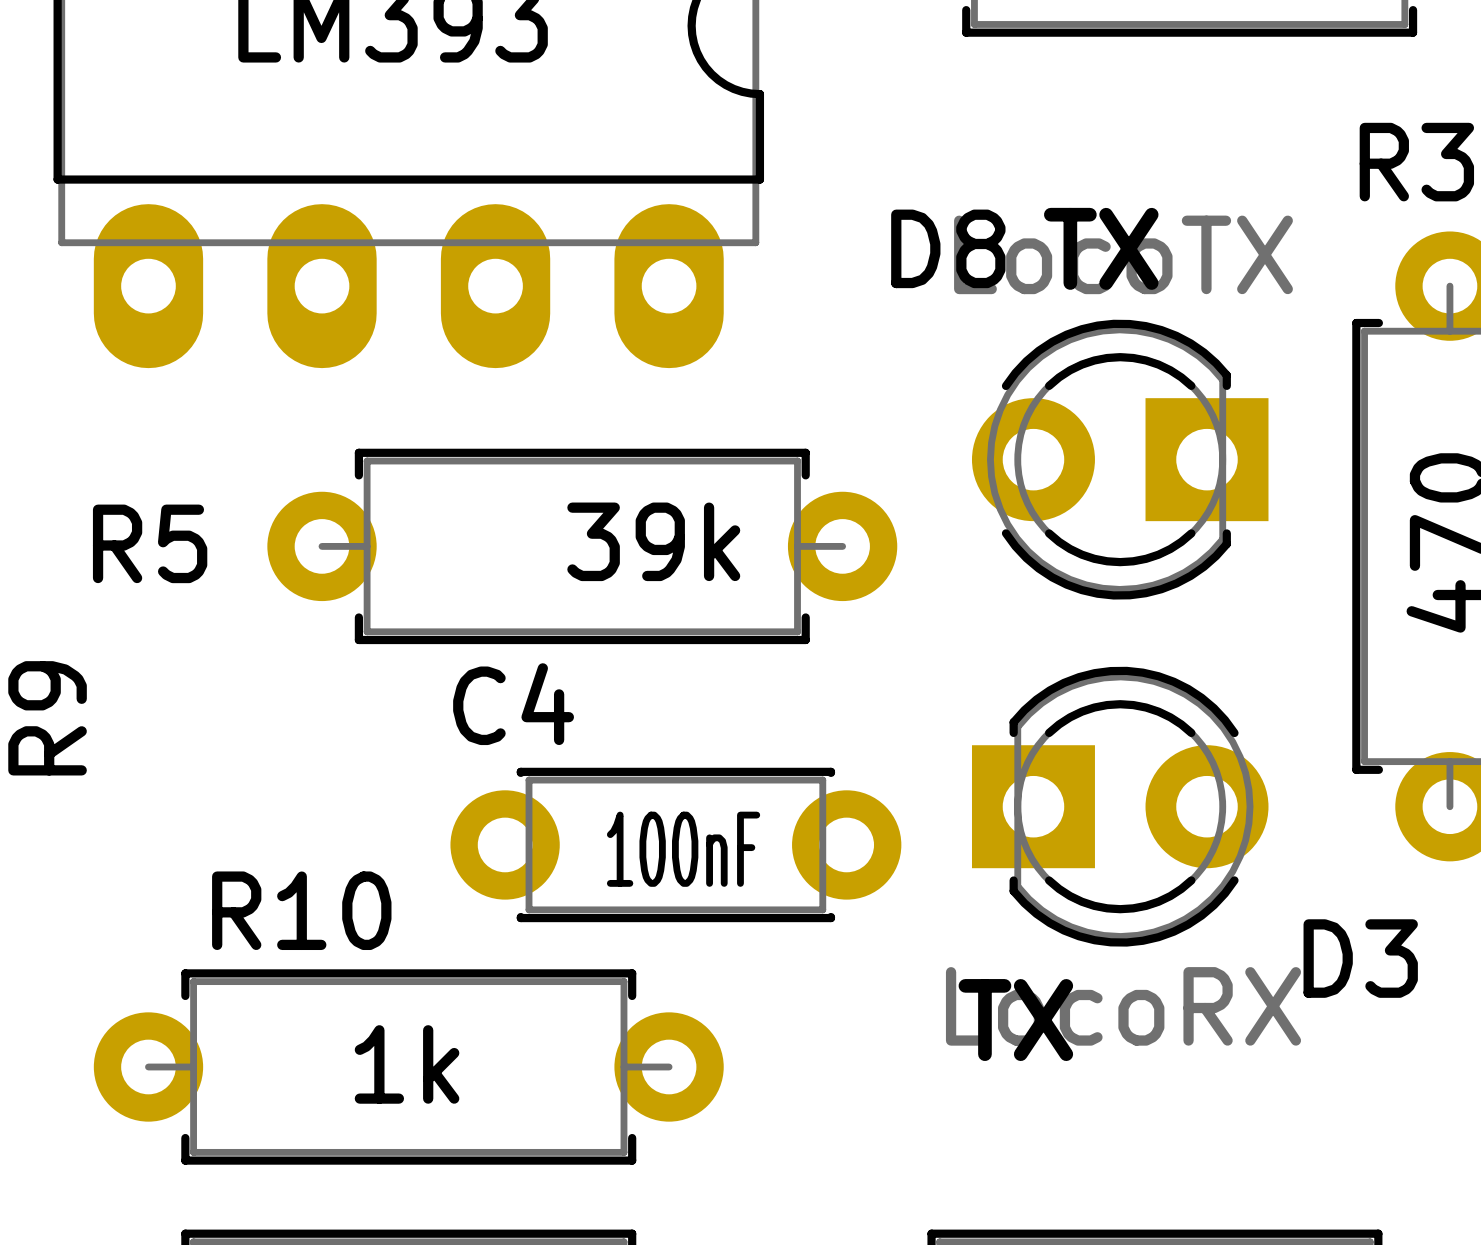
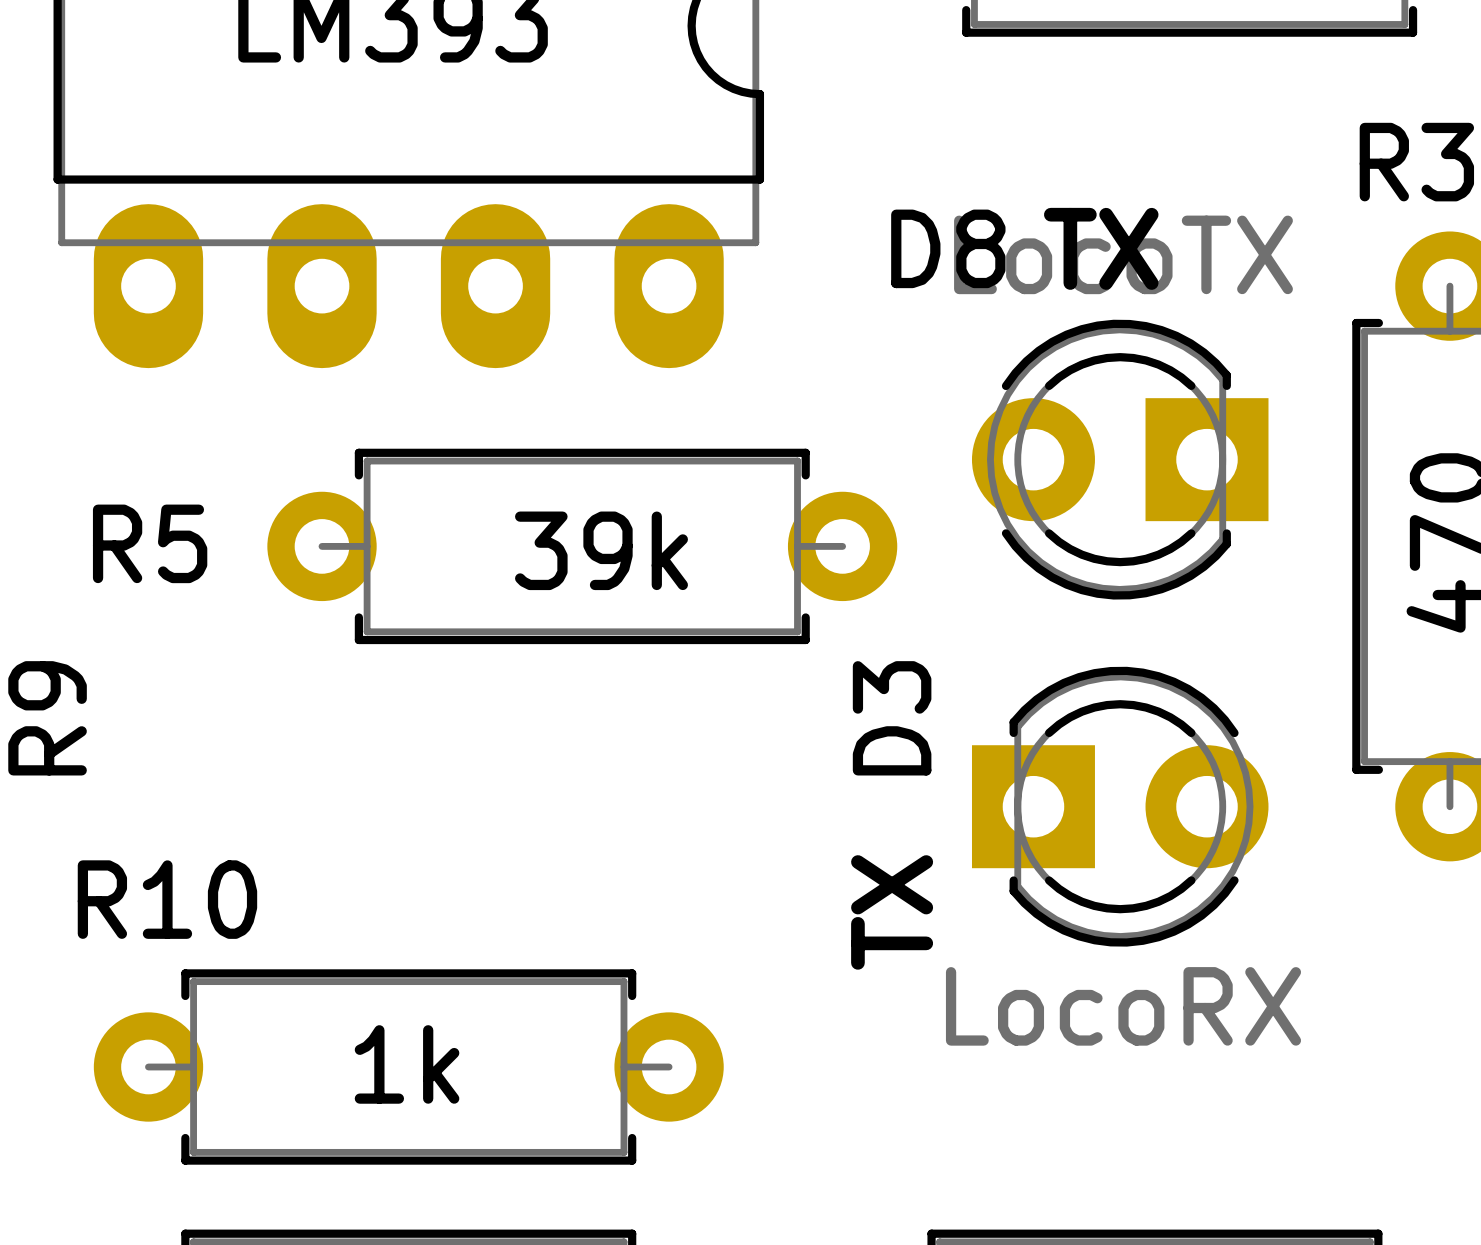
R5 value position: 39k (653, 541) -> 39k (601, 550)
C4: 100nF (675, 844) -> none
R10 name position: R10 (301, 910) -> R10 (167, 899)
D3 name rotation: 0° (1360, 958) -> 90° counterclockwise (892, 718)
D3 name position: D3 (1360, 958) -> D3 (892, 718)
text rotation: 0° (1015, 1020) -> 90° counterclockwise (892, 912)
text position: TX (1015, 1020) -> TX (892, 912)

